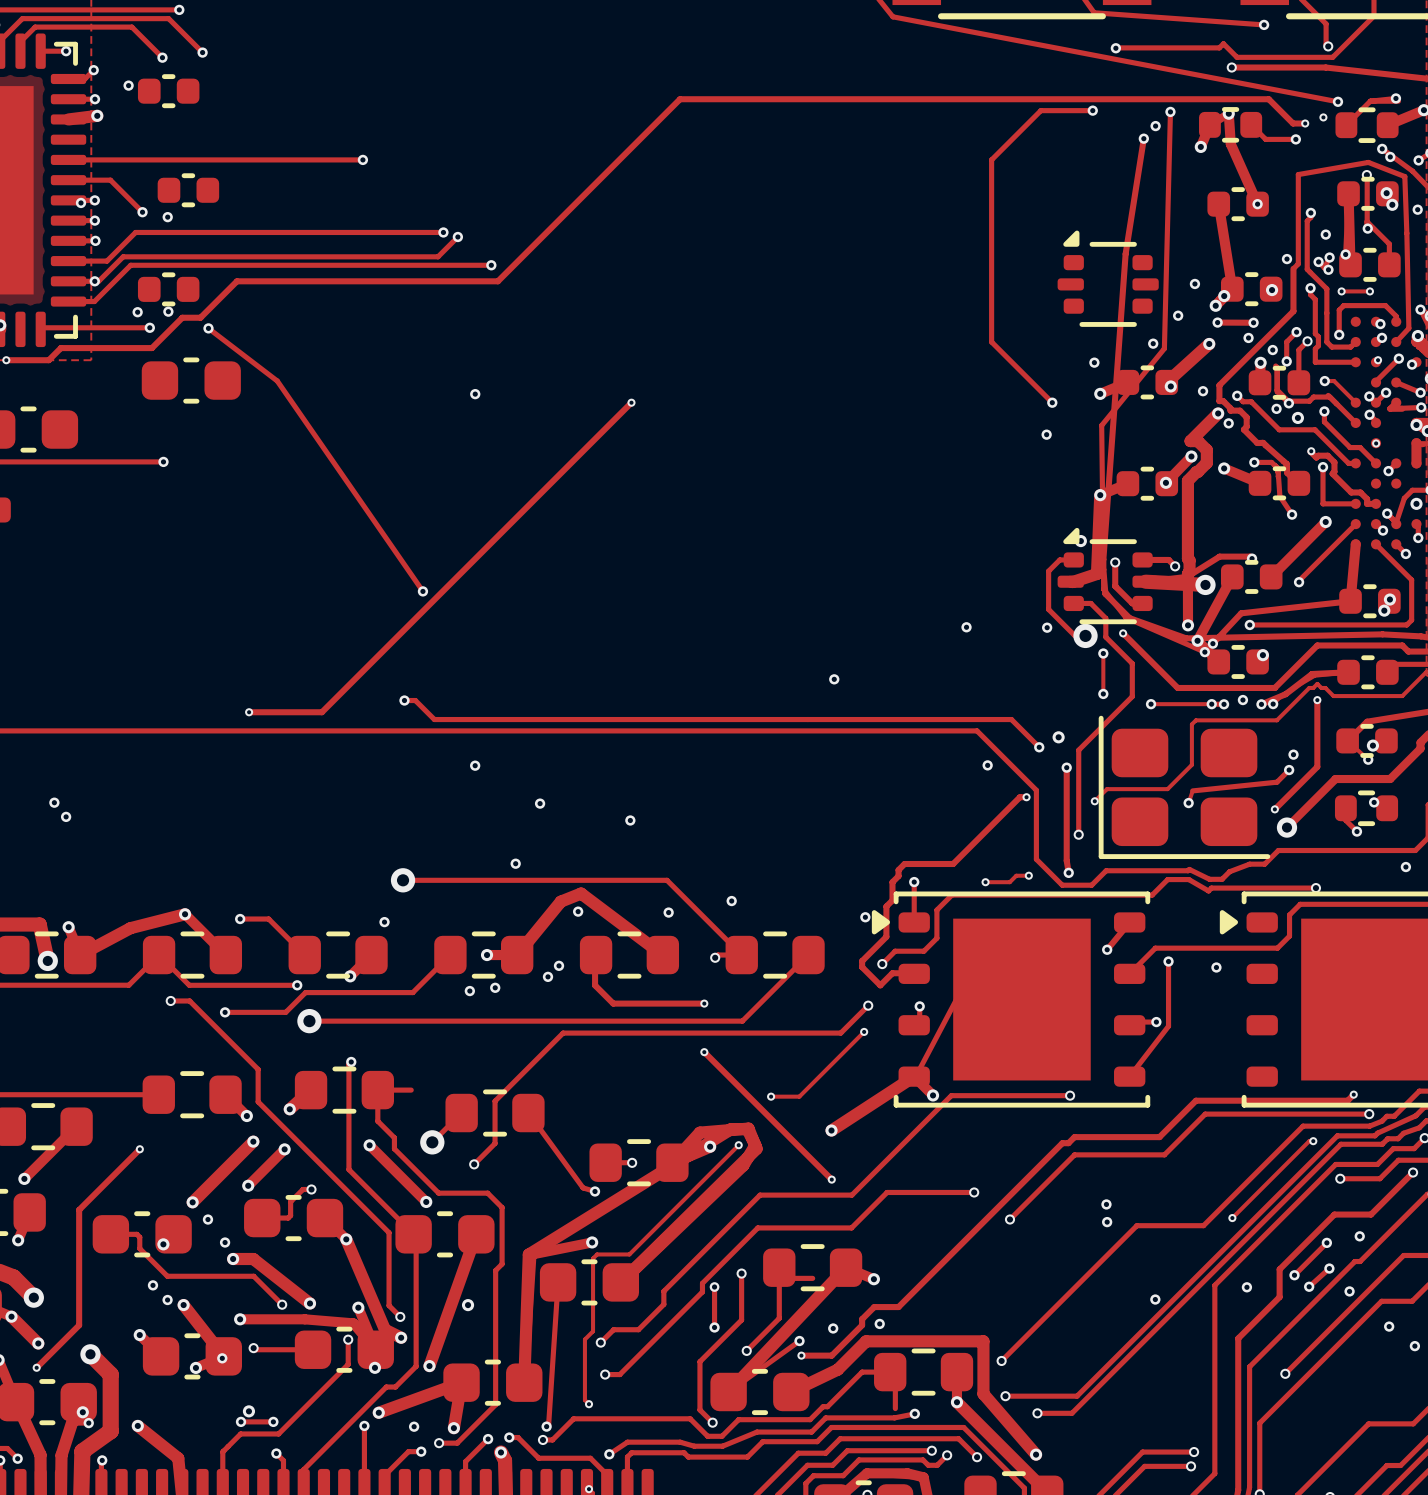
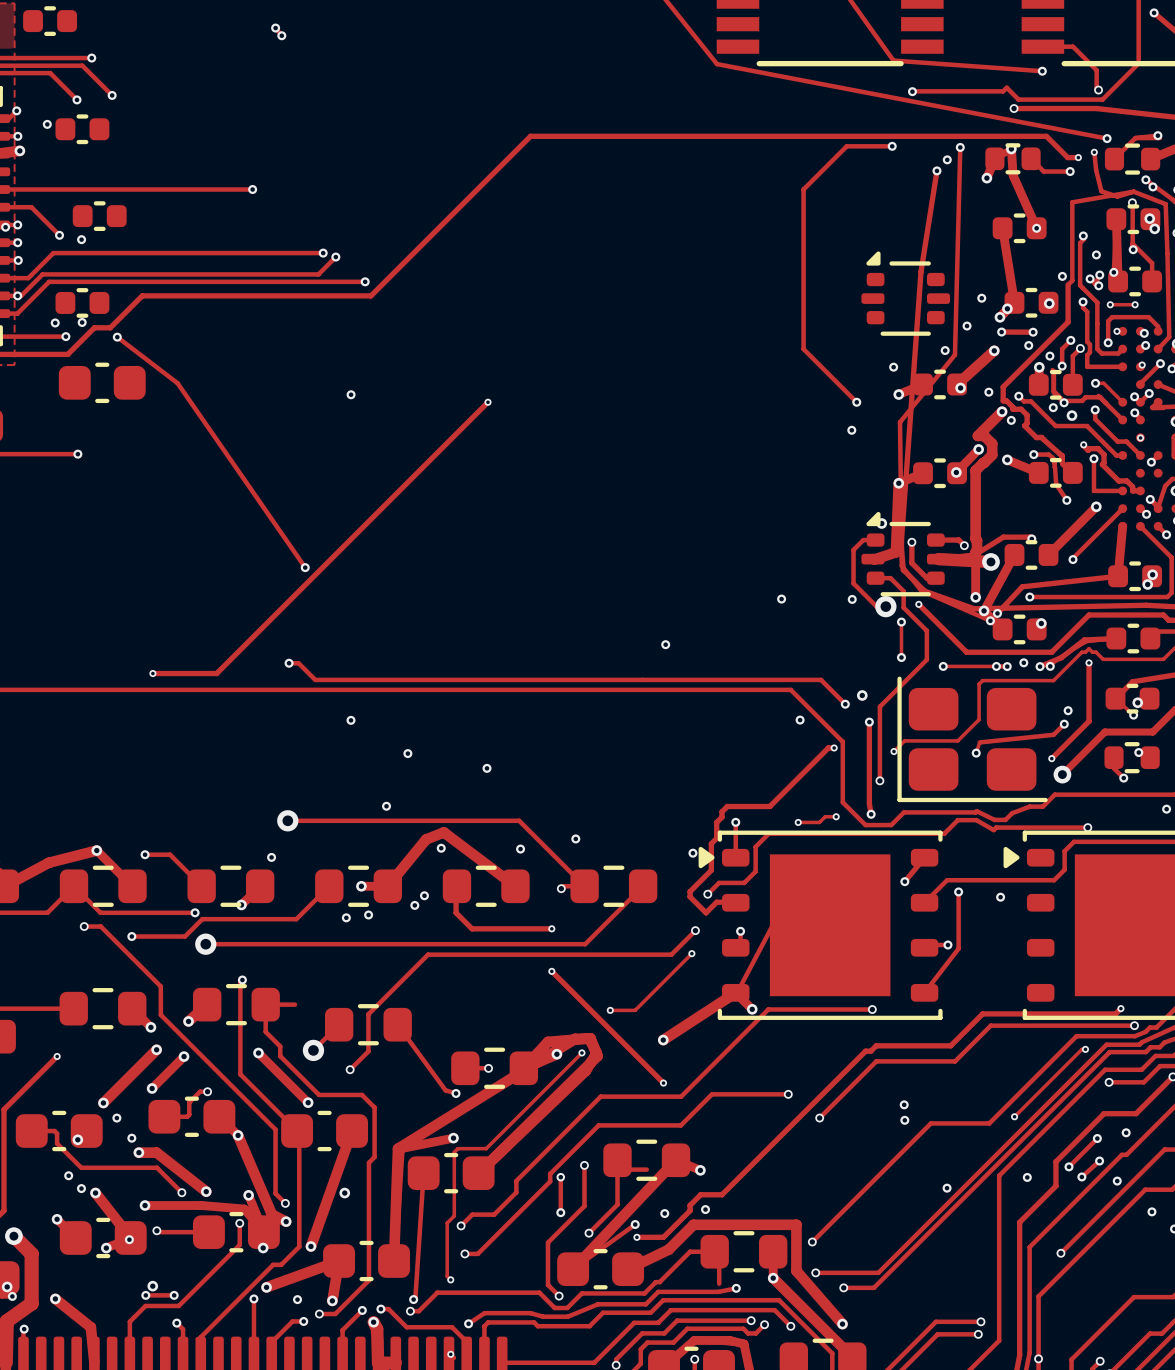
track: none -> (1094, 152) (1101, 191) (1117, 196) (1133, 191)
via: none -> (1117, 331)

